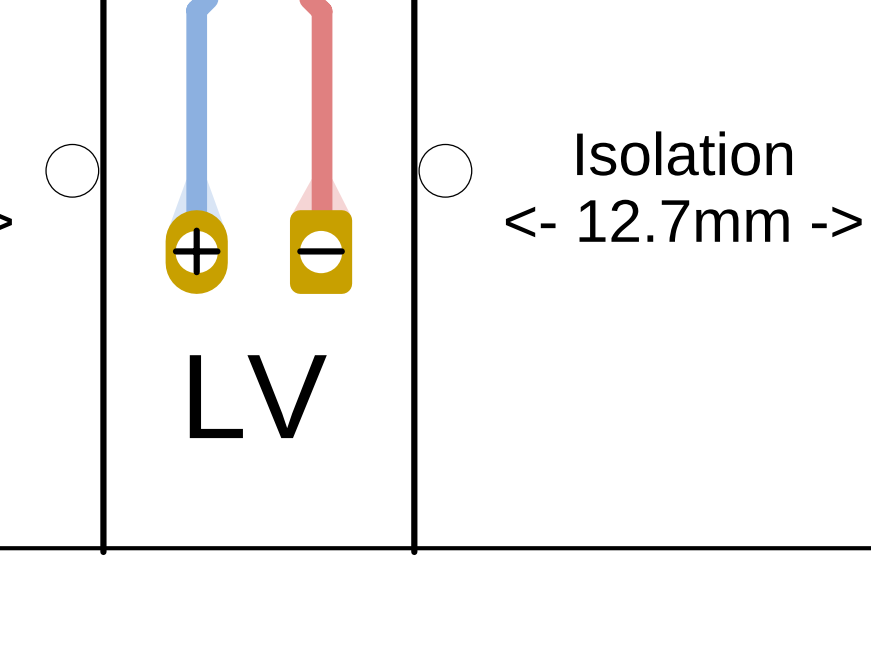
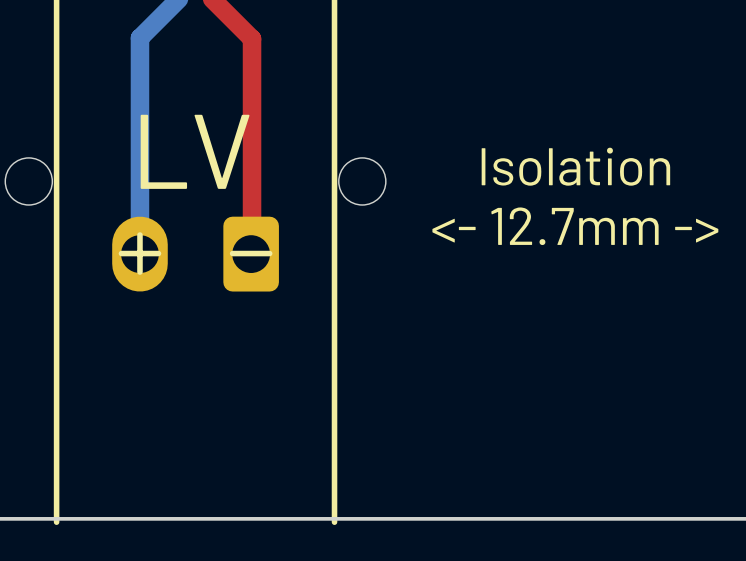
text position: LV (258, 396) -> LV (195, 151)

